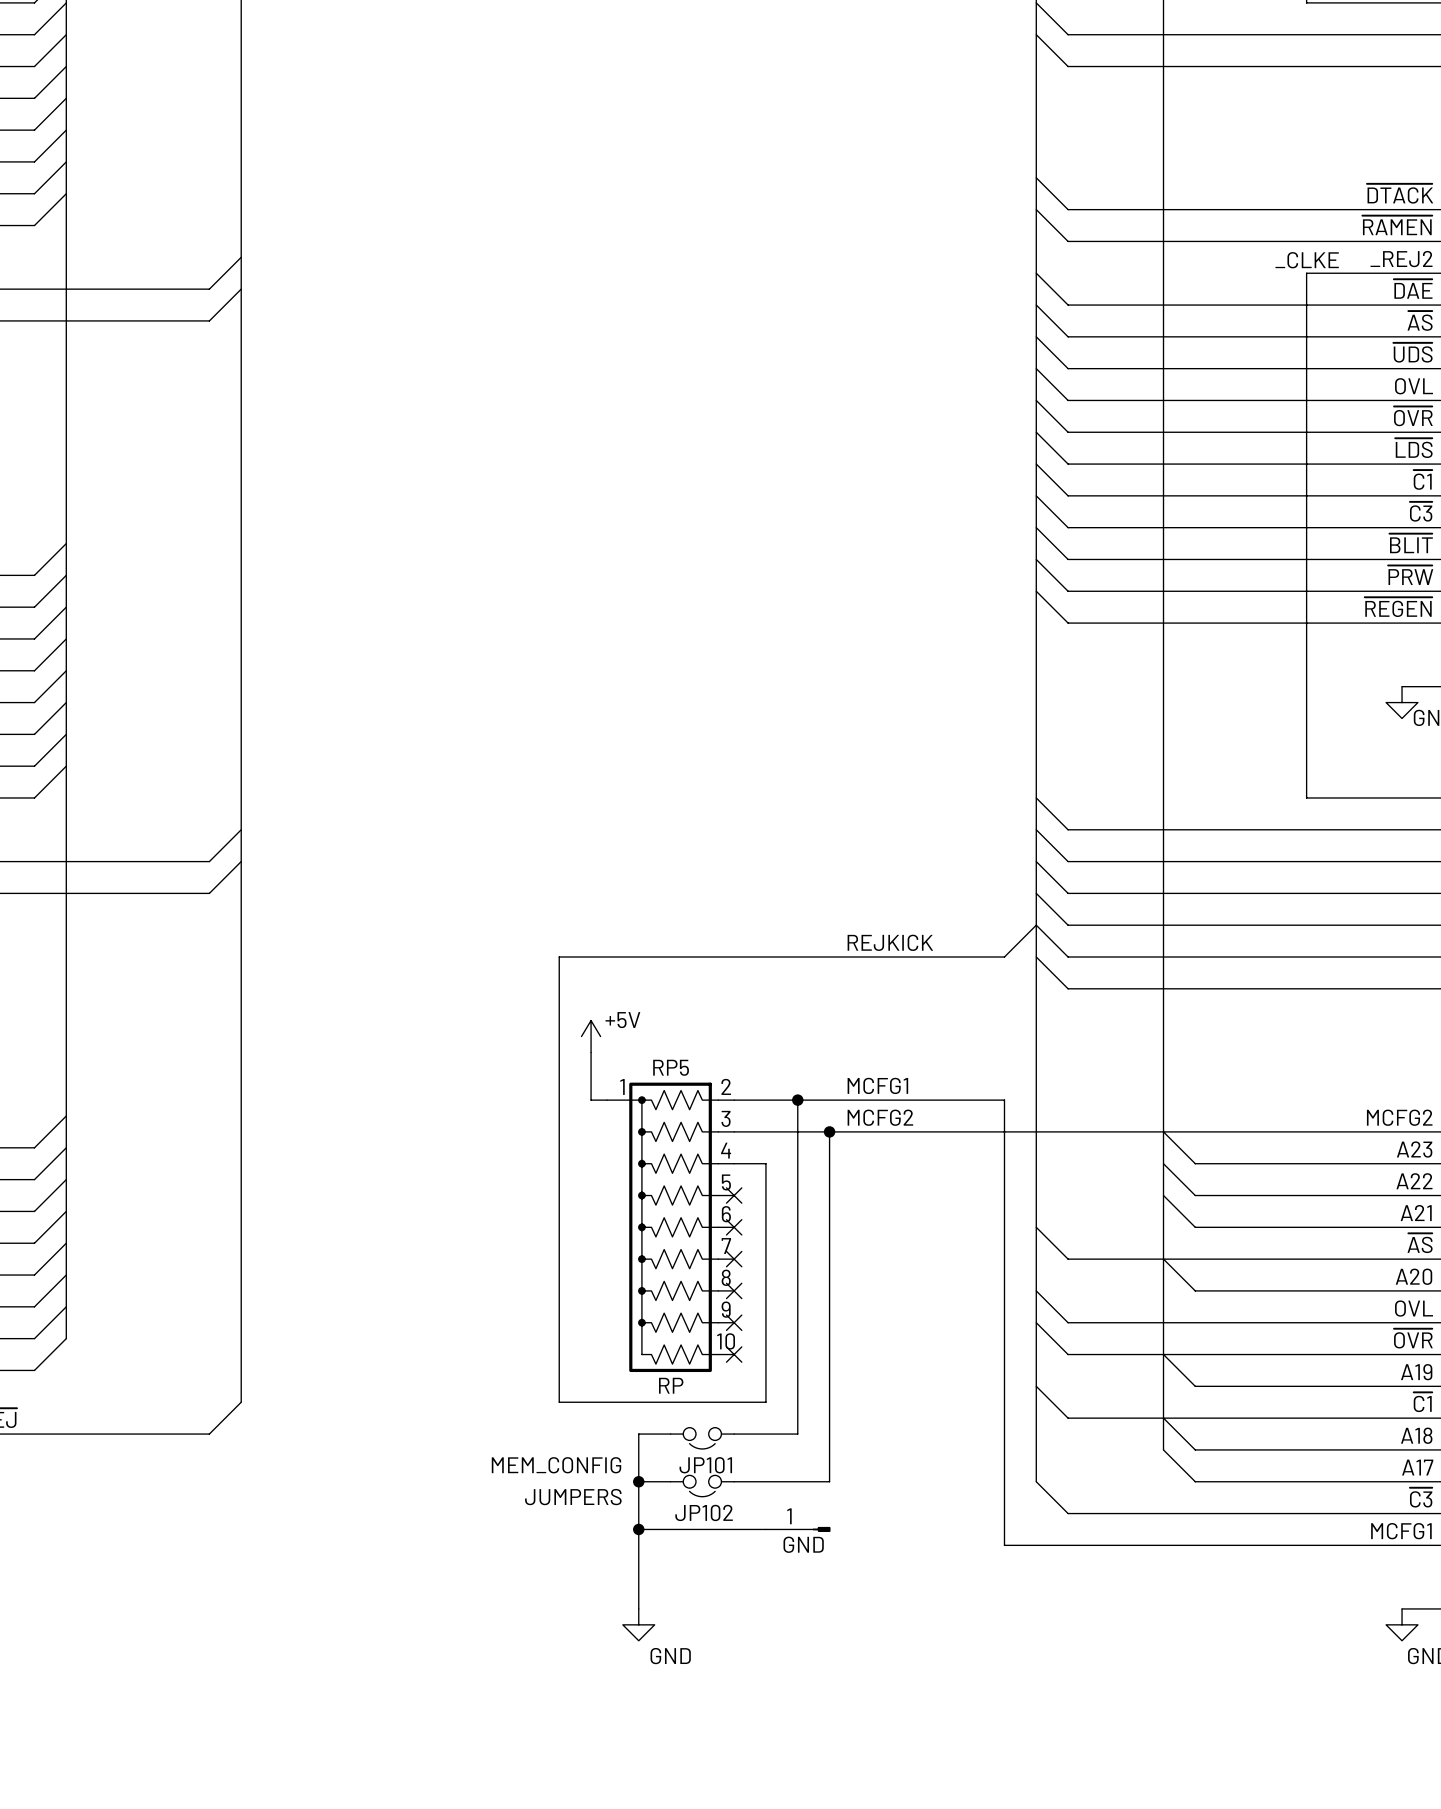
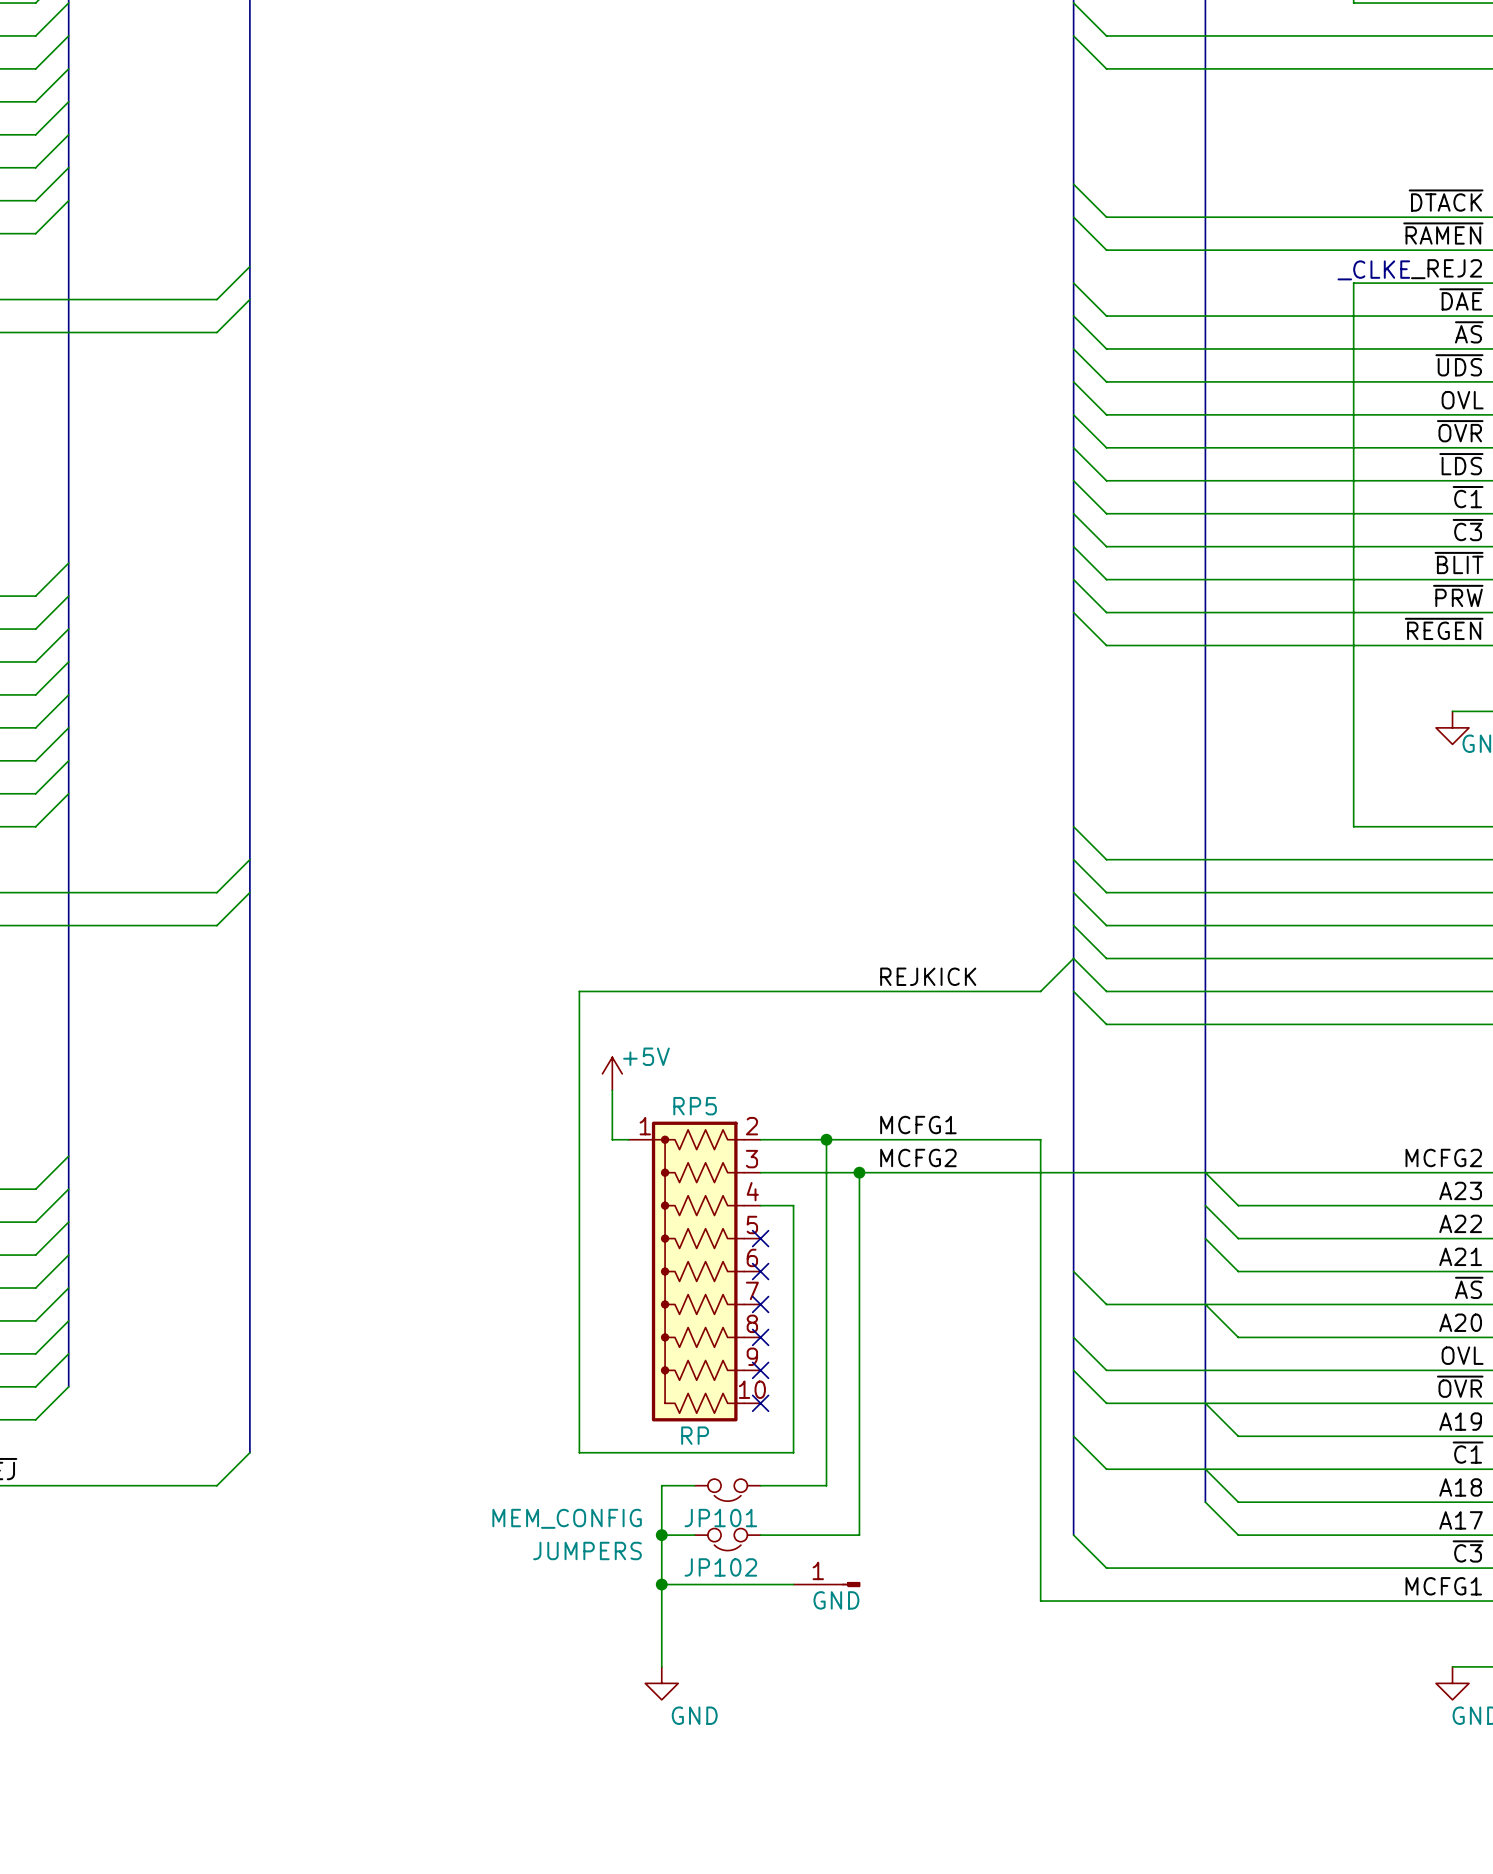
text position: _CLKE (1307, 260) -> _CLKE (1373, 270)

